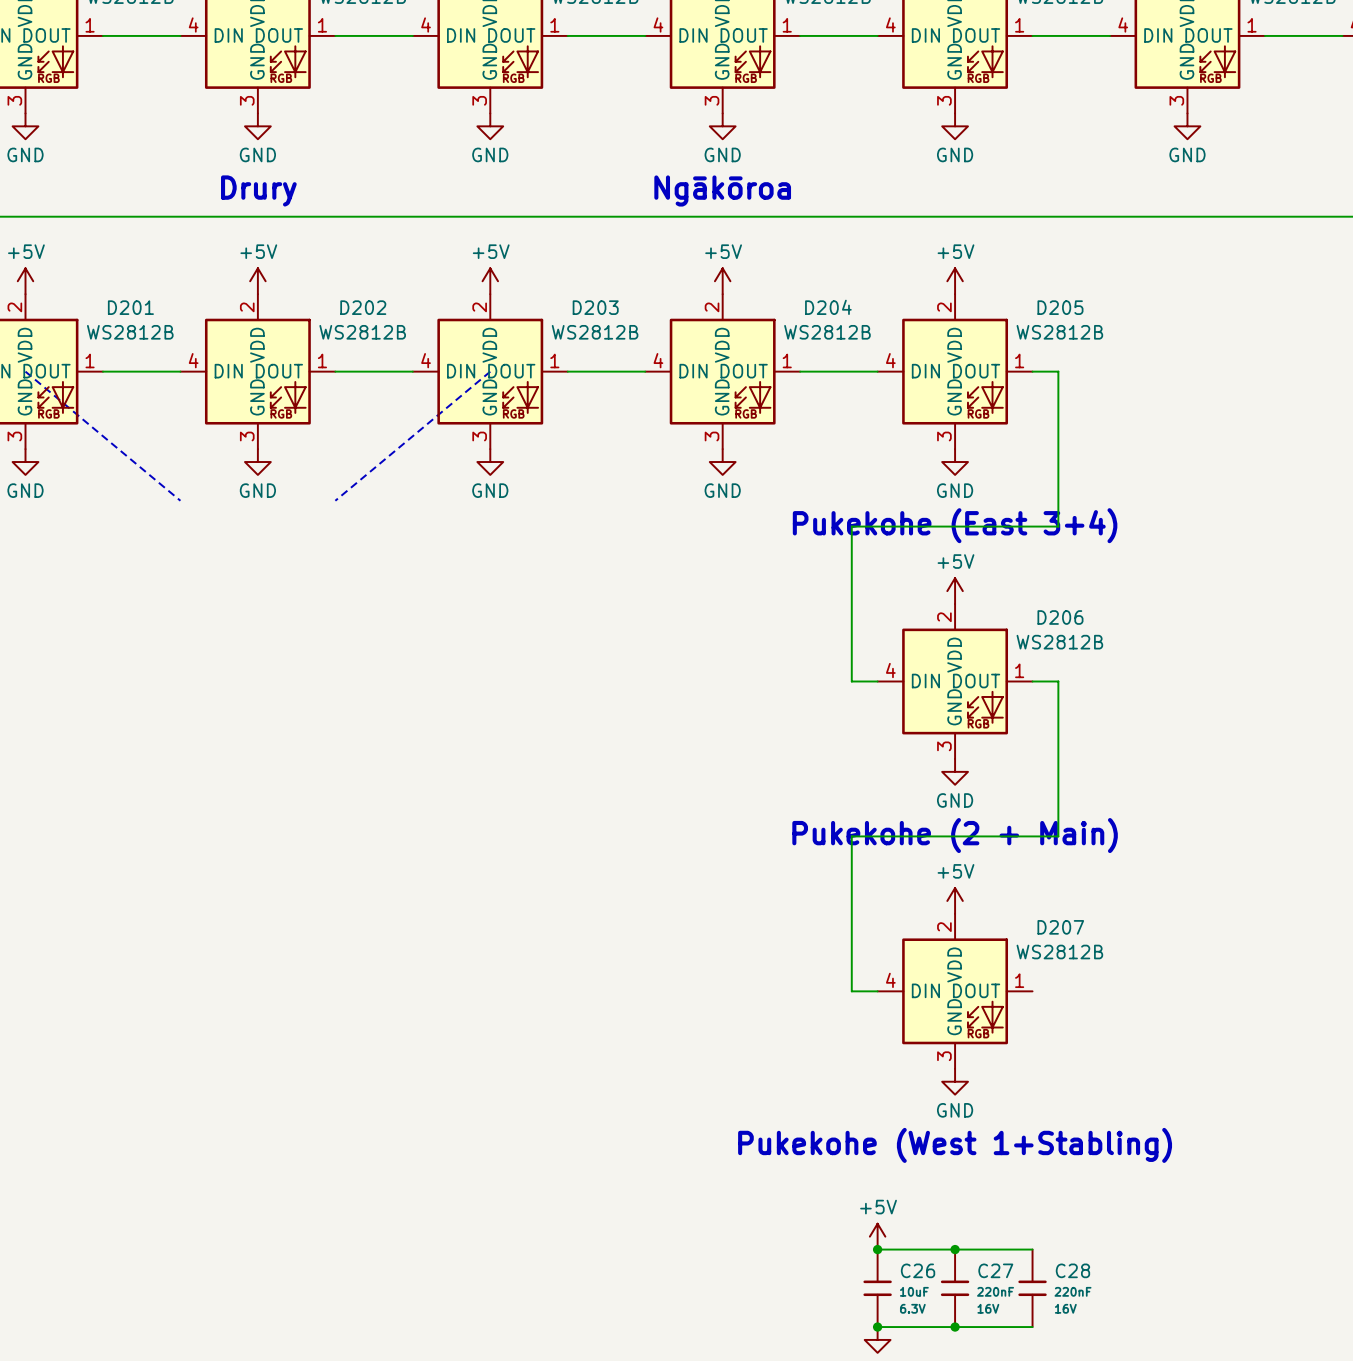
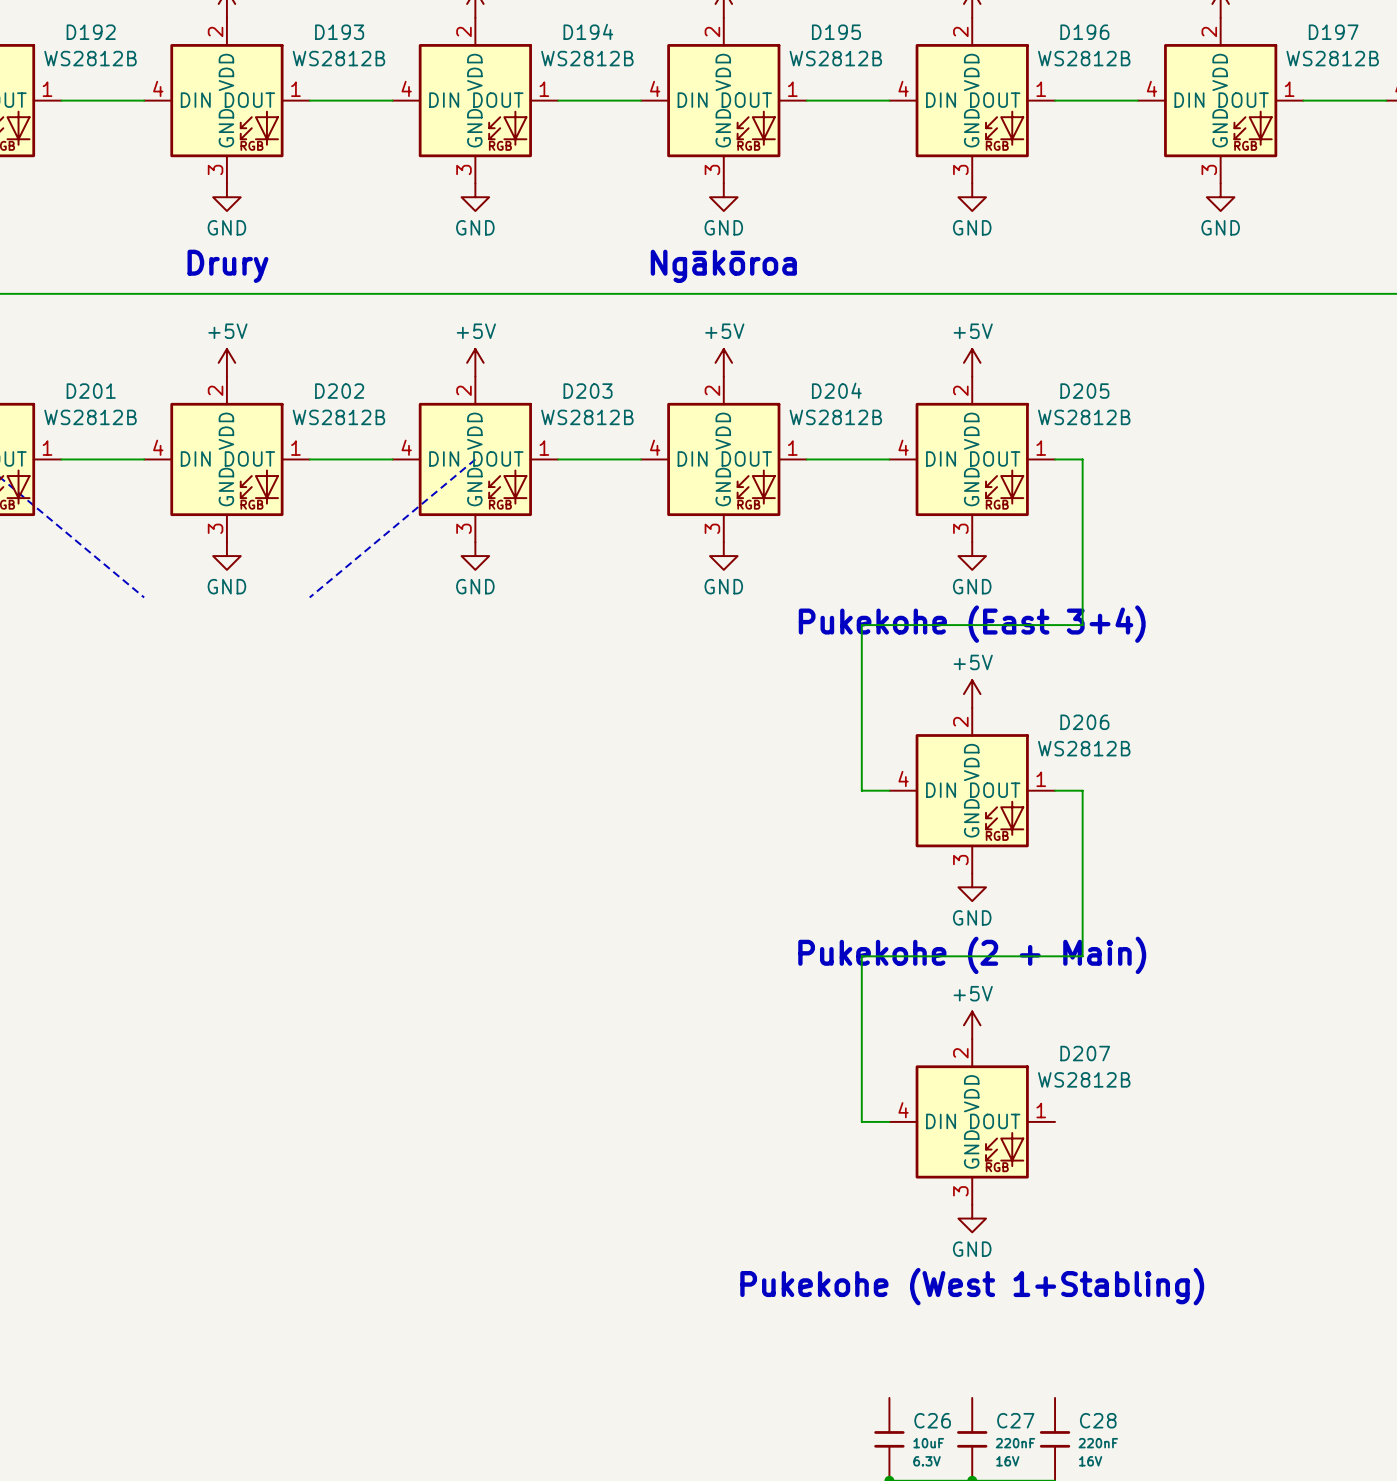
power symbol: +5V (877, 1236) -> none
wire: (877, 1249) (1032, 1249) -> none
junction: (877, 1249) -> none
junction: (955, 1249) -> none

